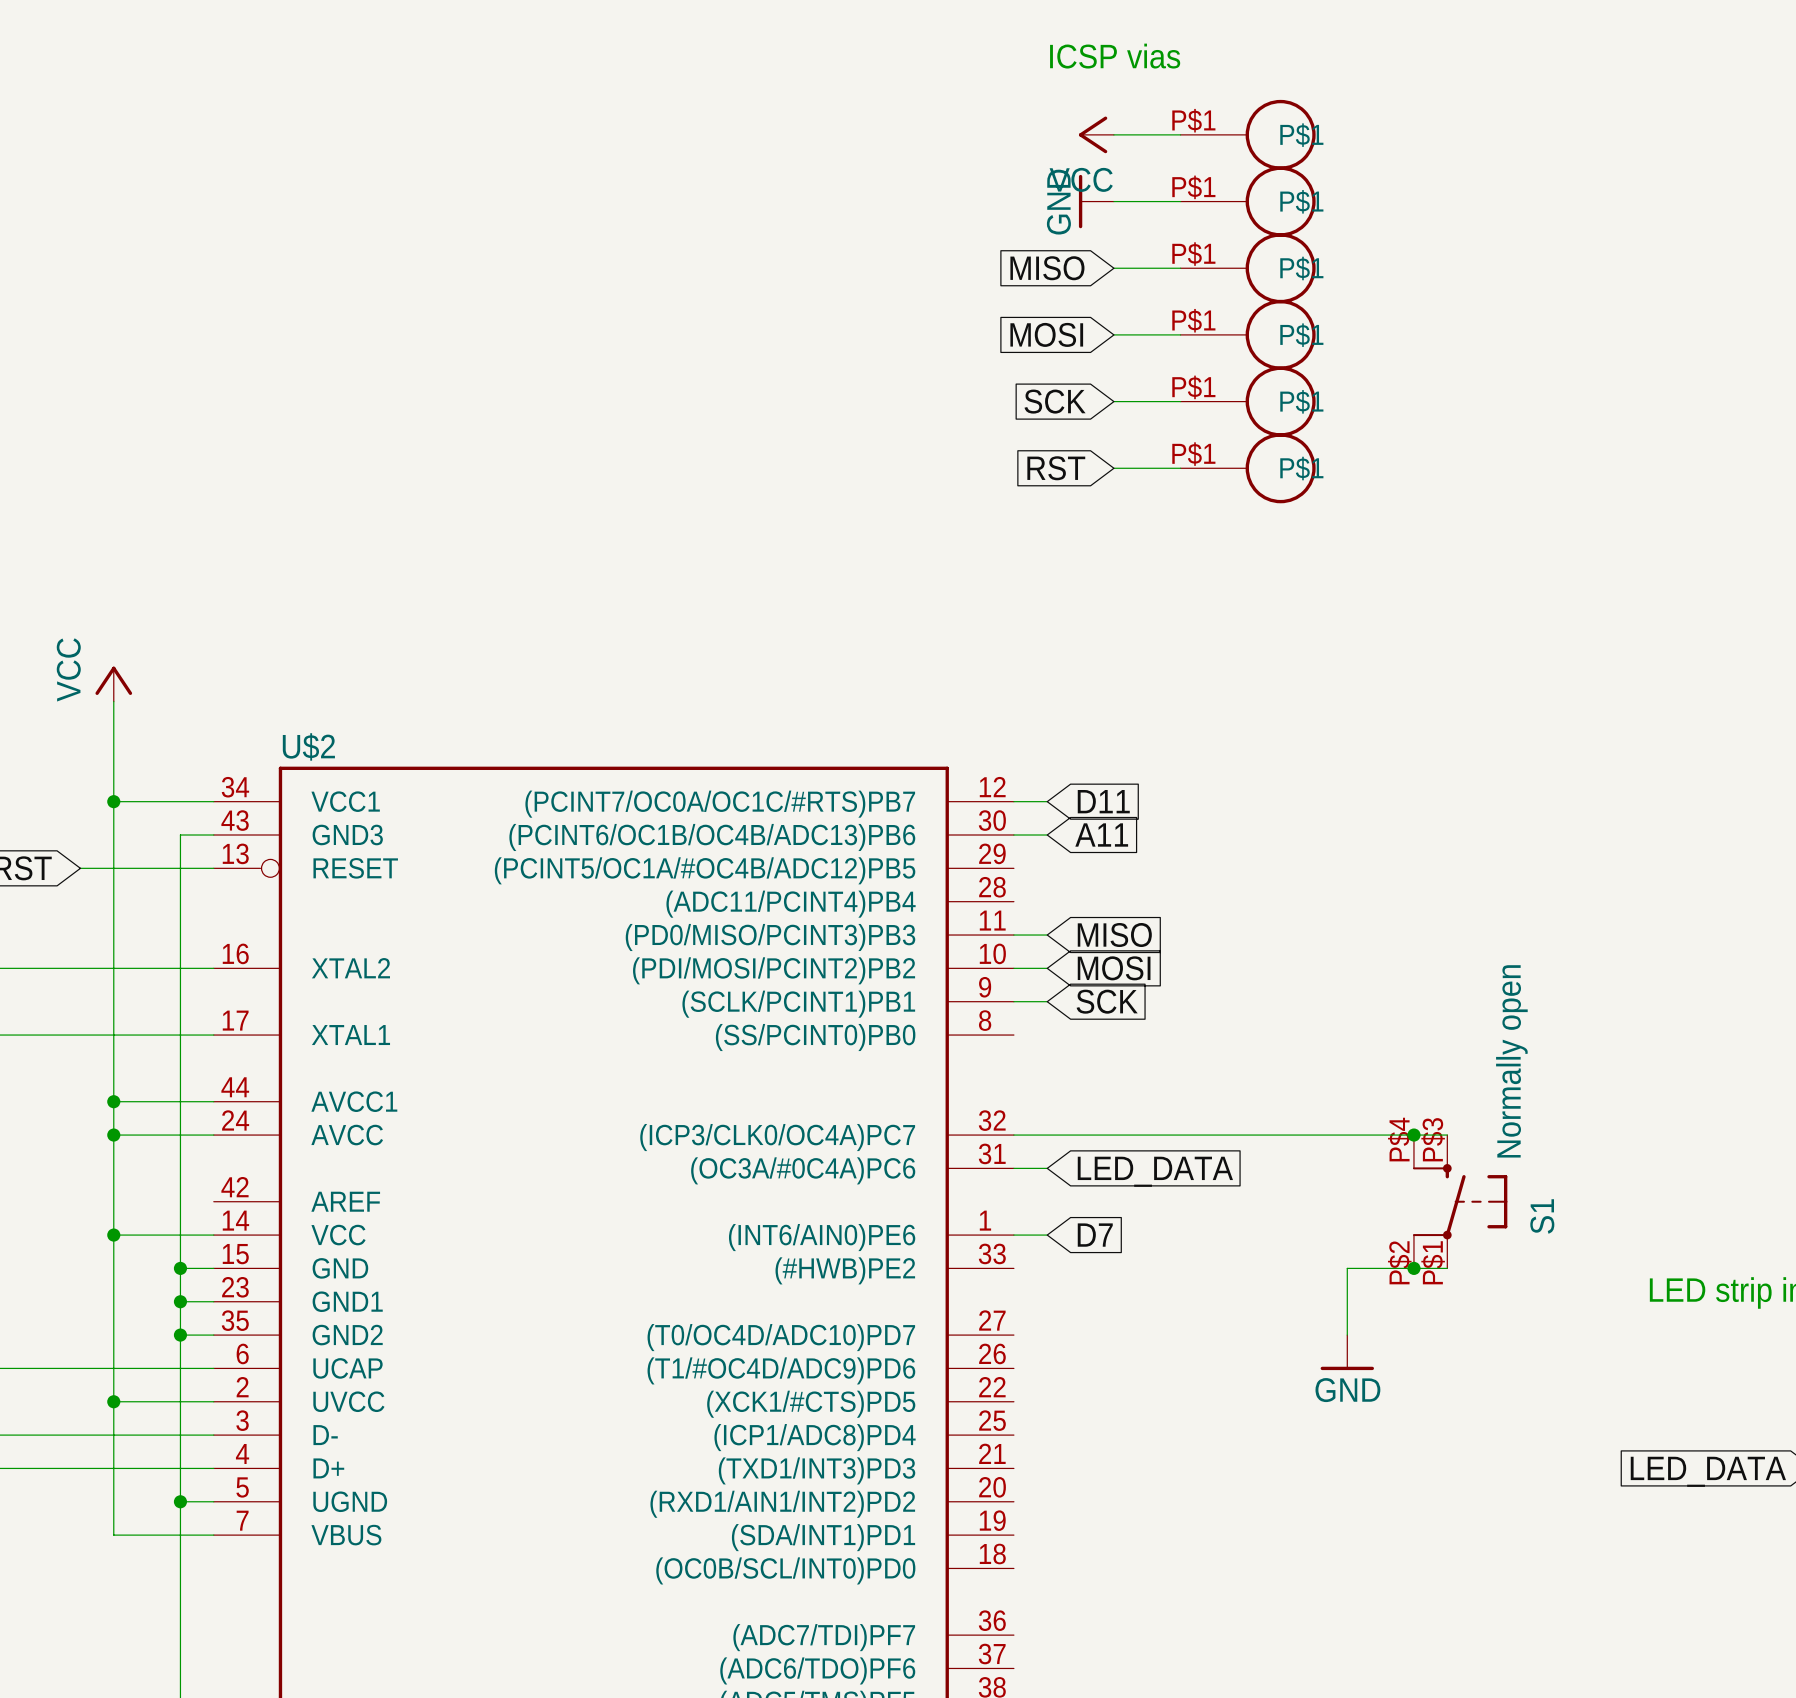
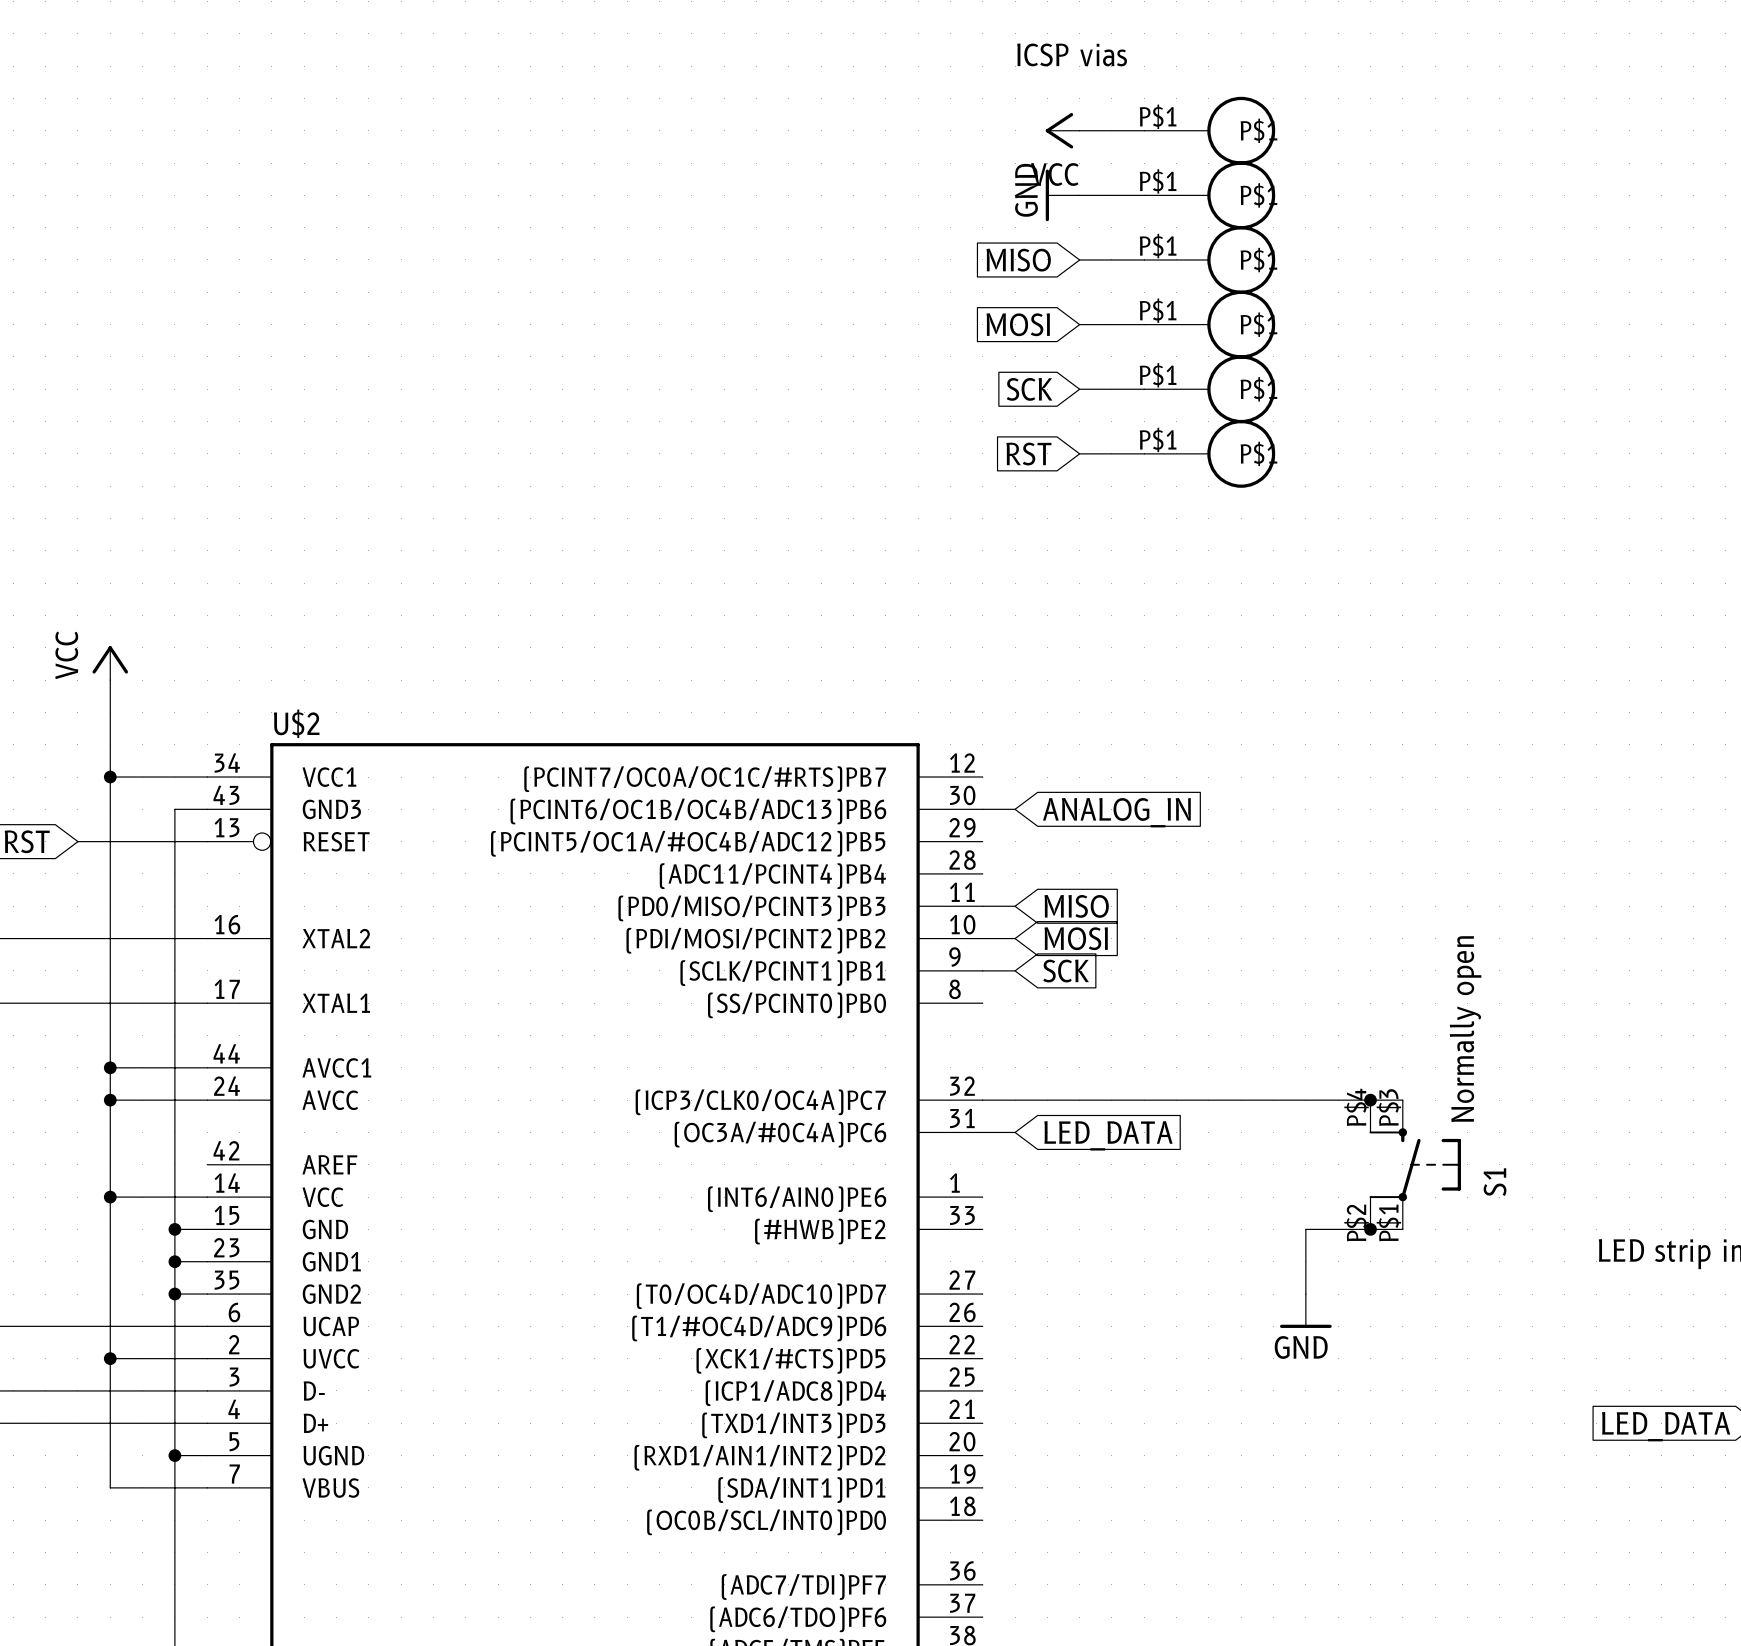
wire: (1013, 801) (1047, 801) -> none
global label: D11 (1103, 801) -> none
global label: A11 (1101, 835) -> ANALOG_IN (1116, 812)
wire: (1013, 1235) (1047, 1235) -> none
global label: D7 (1095, 1235) -> none

